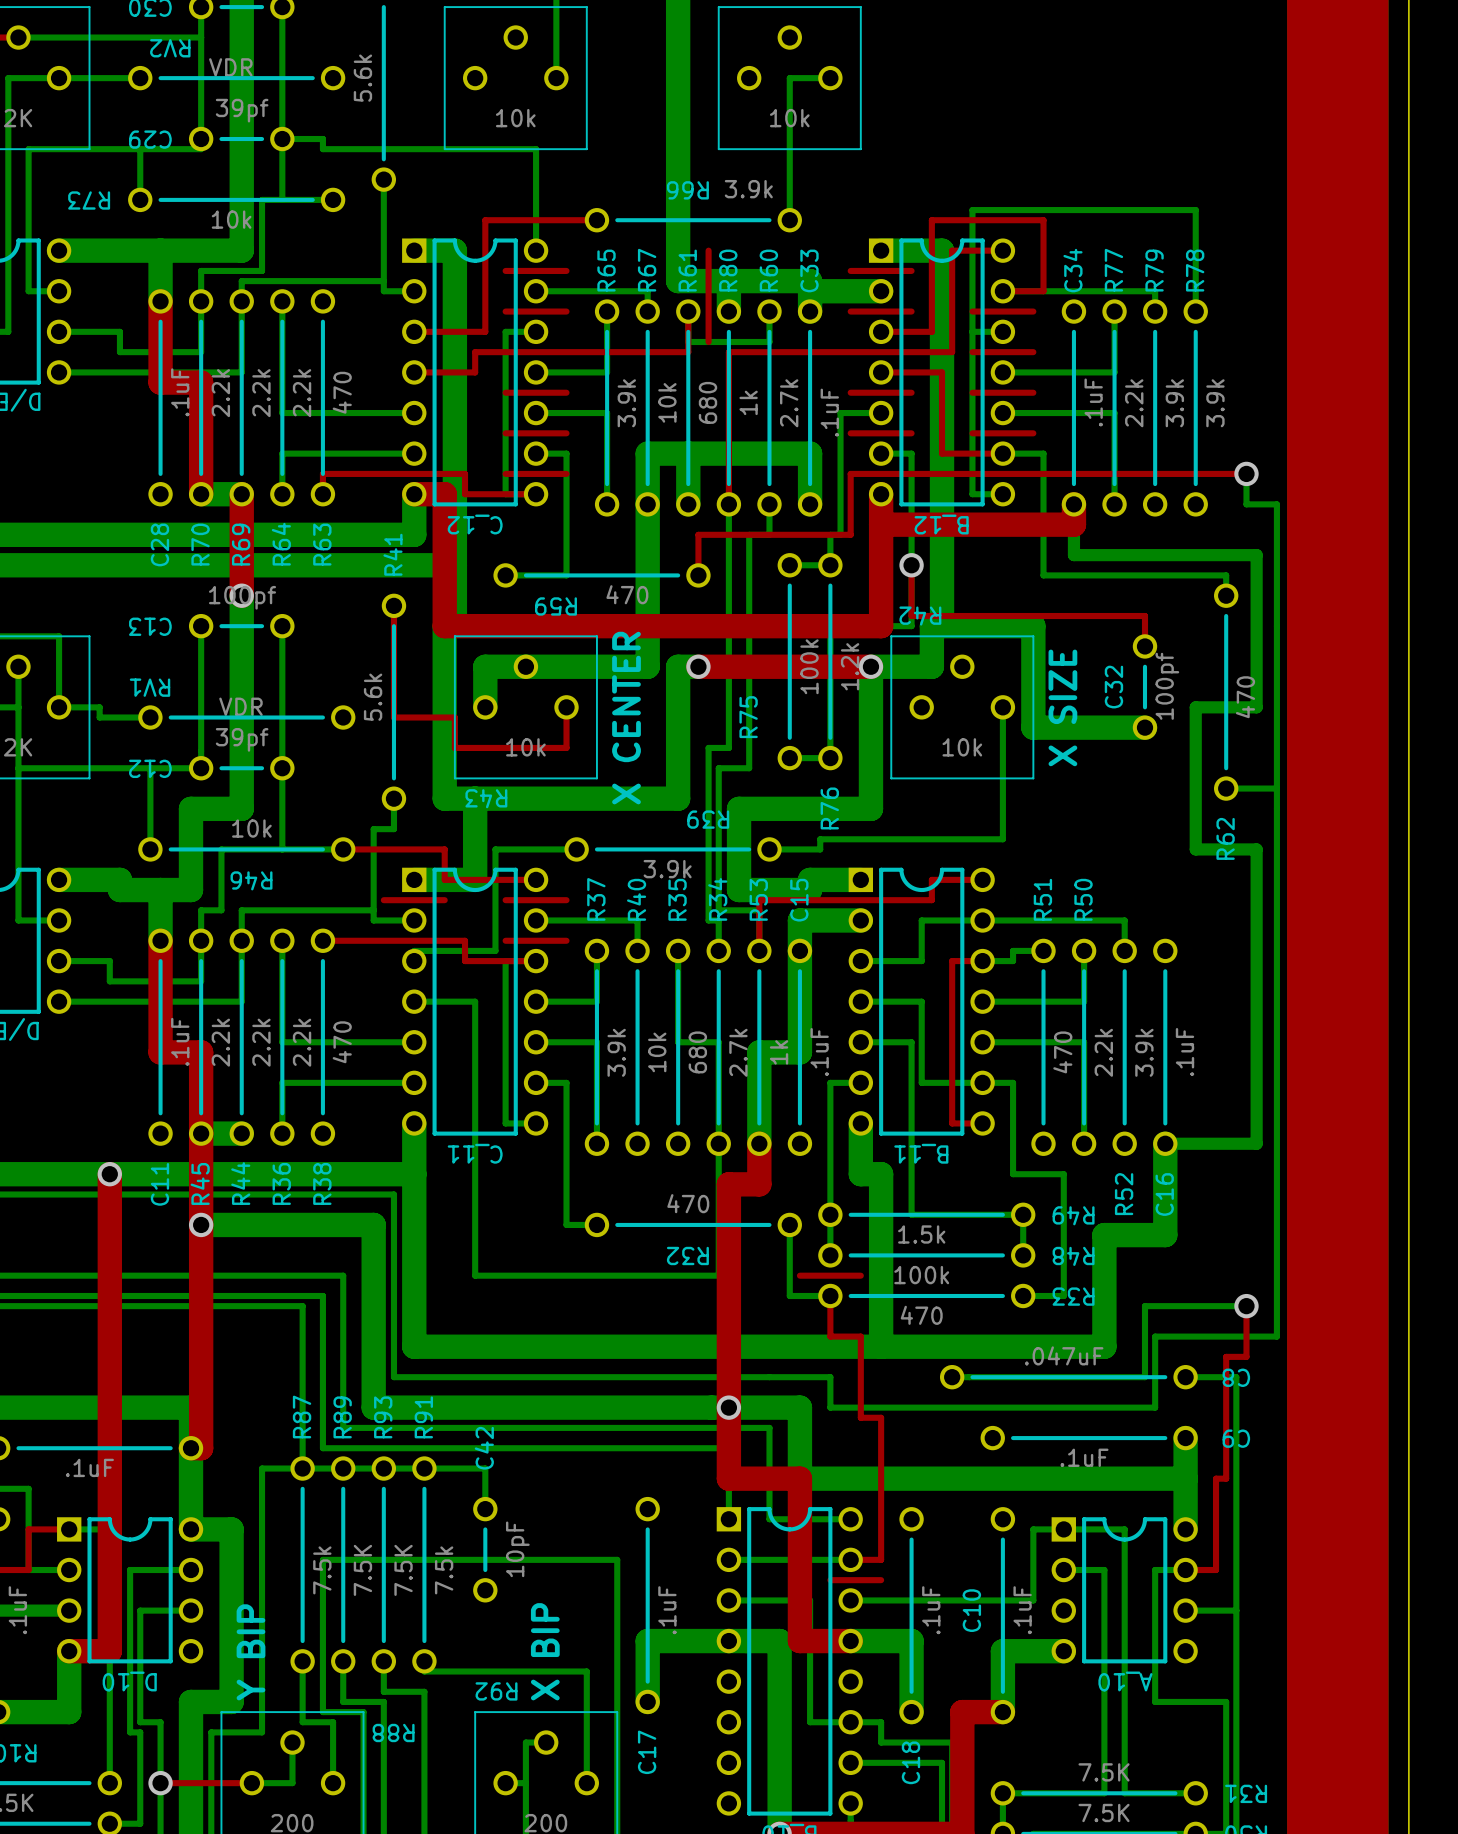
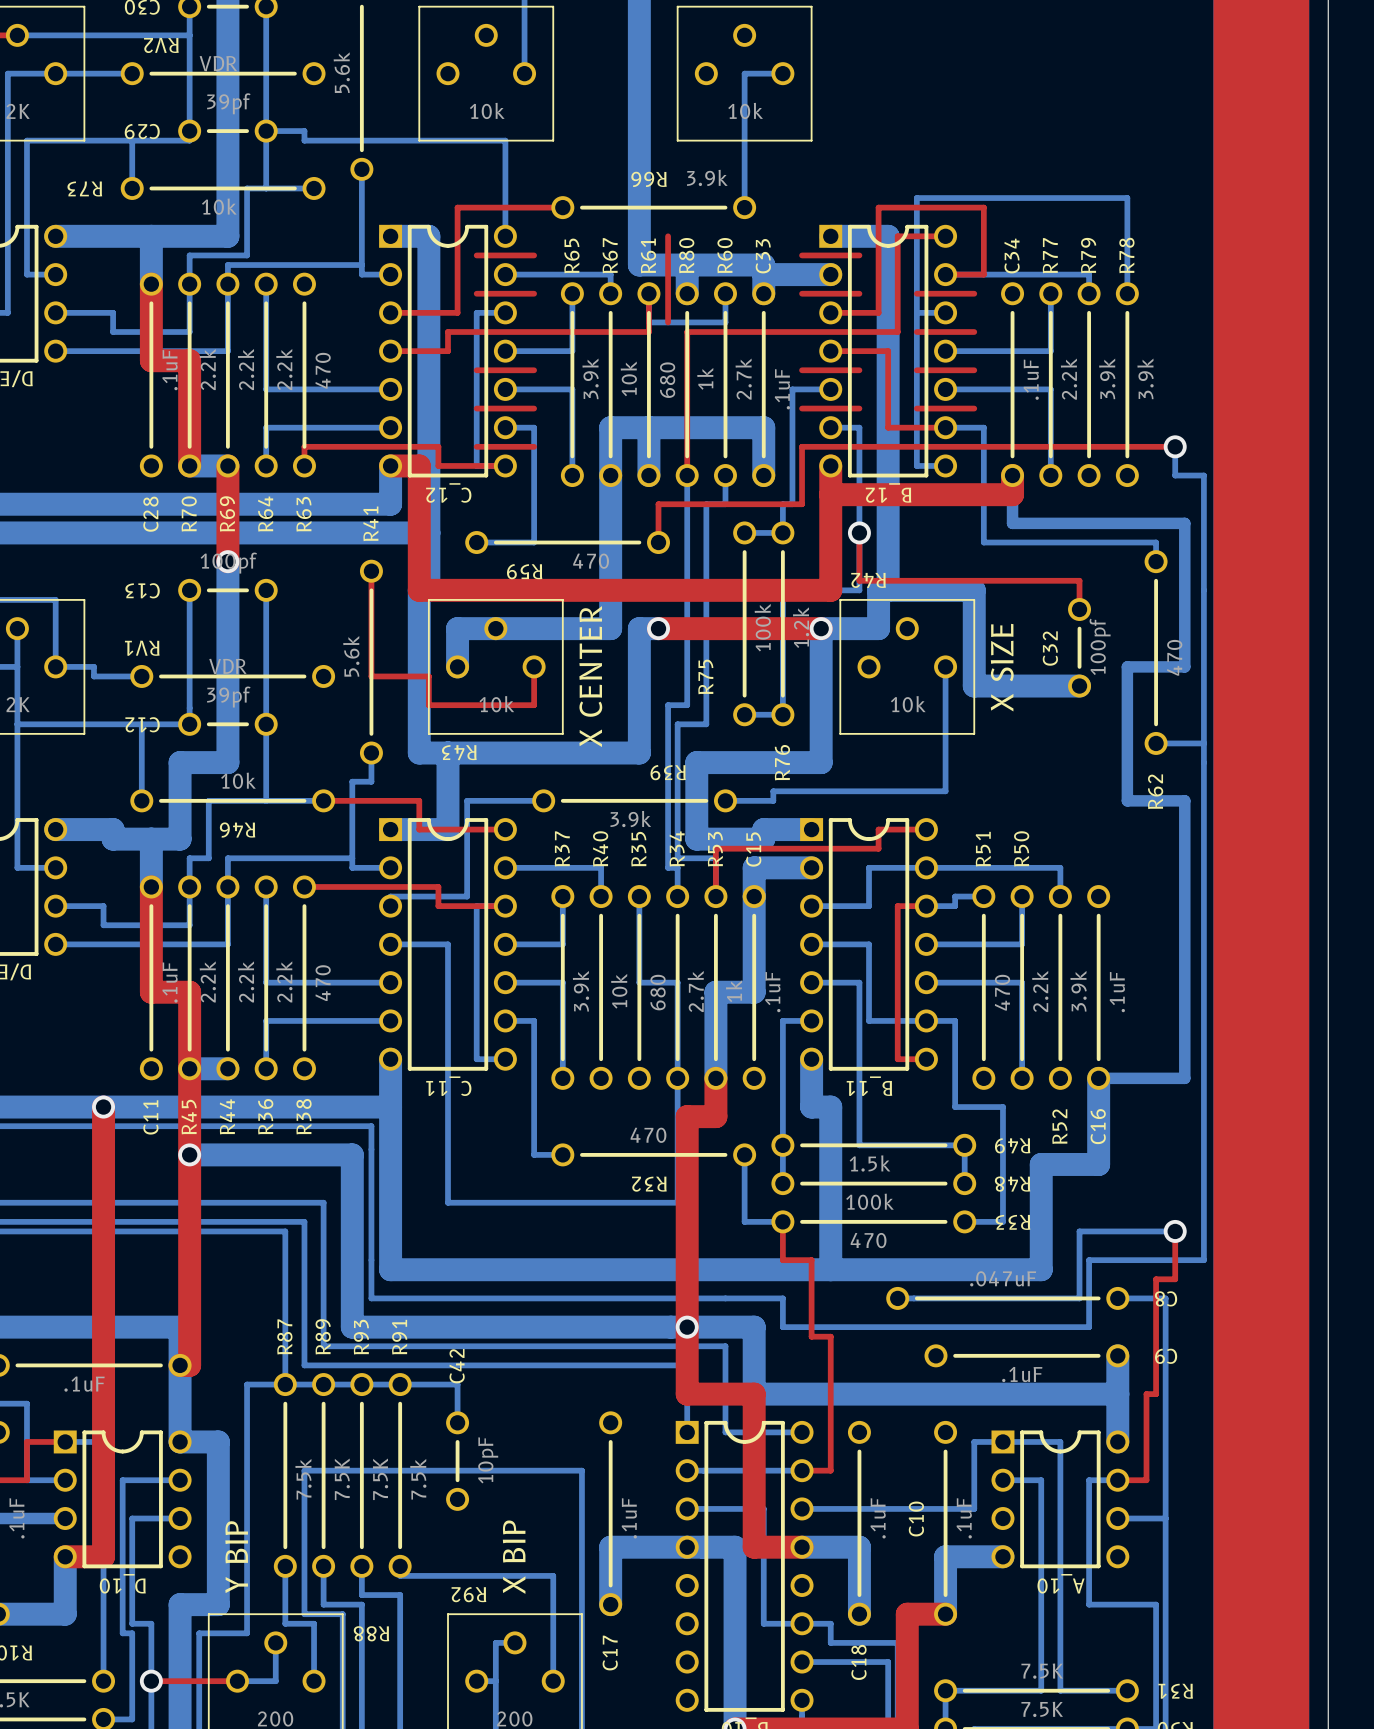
top track: (383, 900) (444, 900) -> none
top track: (505, 900) (566, 900) -> none
top track: (505, 940) (566, 940) -> none
top track: (799, 1275) (860, 1275) -> none
top track: (830, 1580) (881, 1580) -> none

